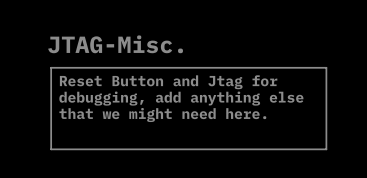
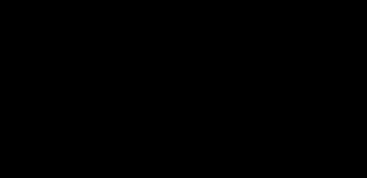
text: JTAG-Misc. (115, 44) -> none
line: (51, 67) (326, 67) (326, 149) (51, 149) (51, 67) -> none
text: Reset Button and Jtag for (168, 82) -> none
text: debugging, add anything else (181, 98) -> none
text: that we might need here. (162, 115) -> none

